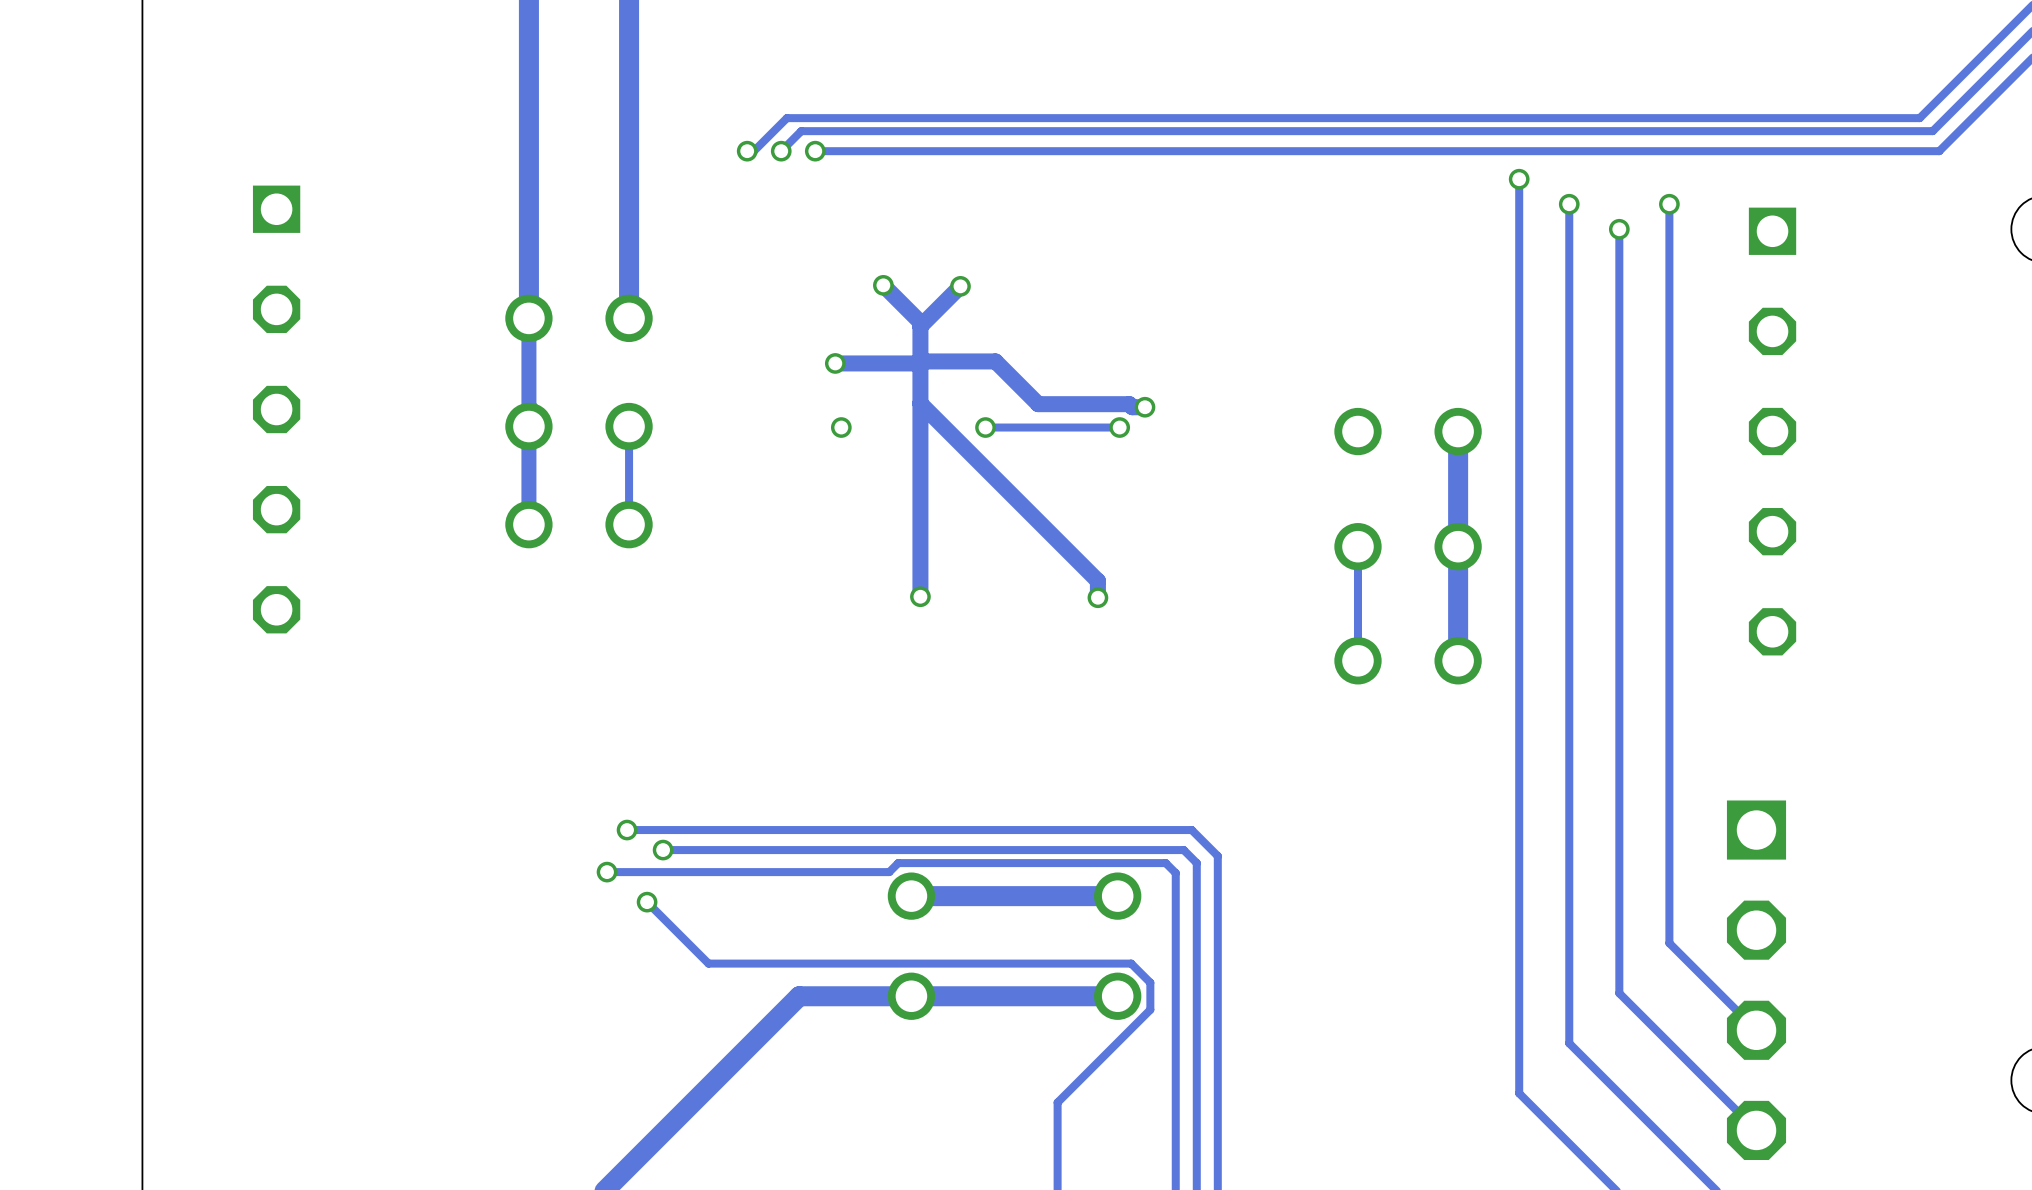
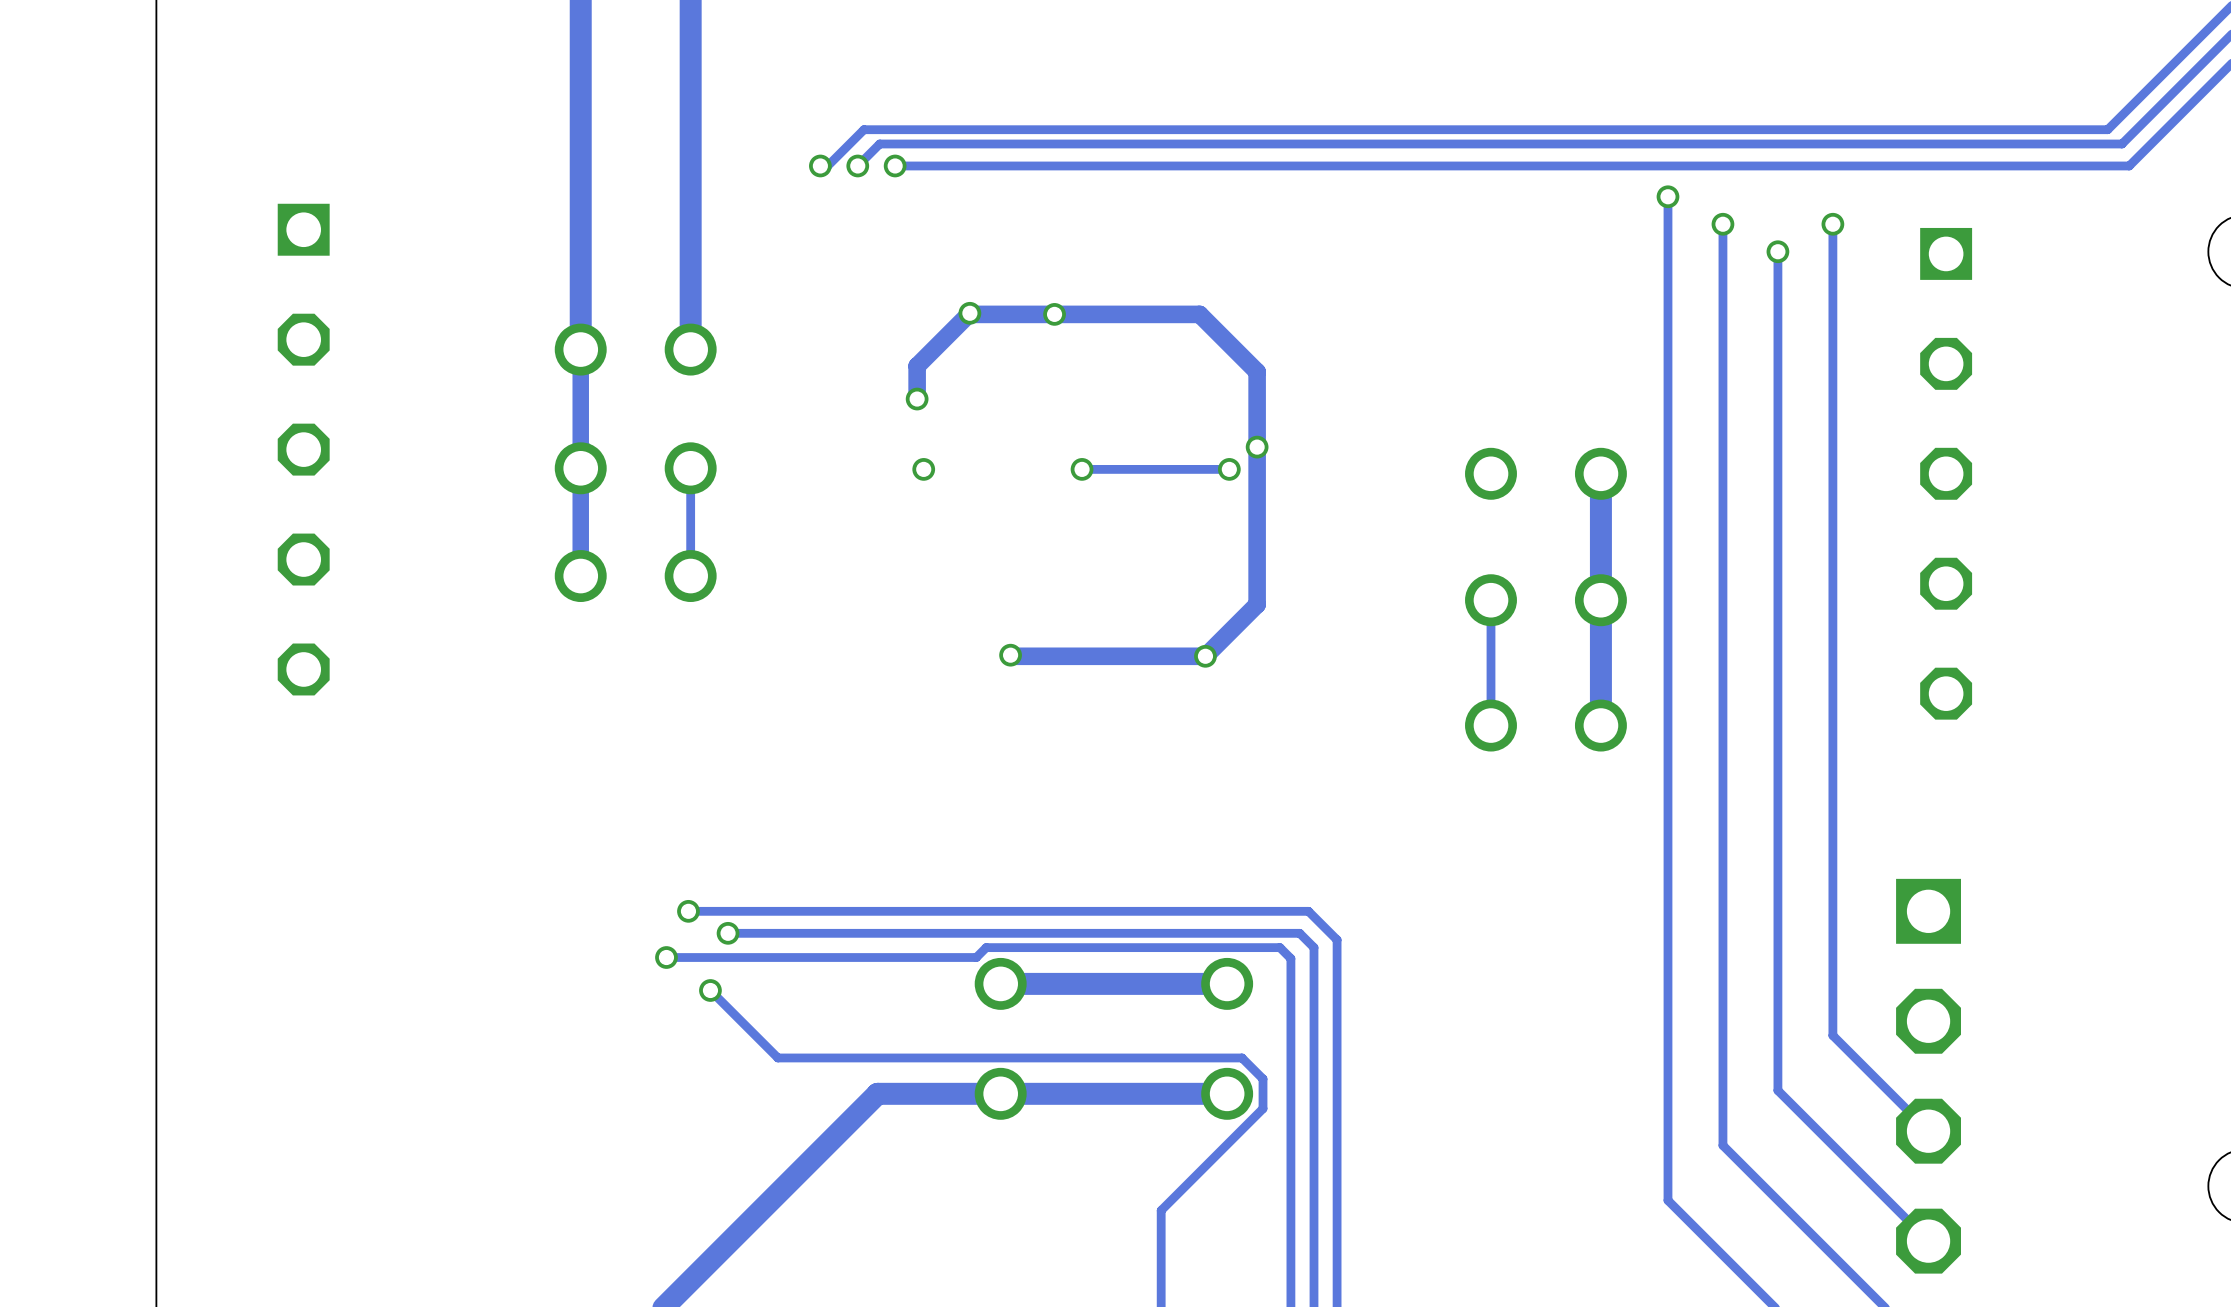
track: (884, 286) (920, 322) (920, 596) -> (971, 314) (1199, 314) (1257, 371) (1257, 604) (1205, 656) (1010, 655)
track: (960, 286) (920, 326) -> none
track: (835, 363) (995, 361) (1038, 404) (1129, 404) (1132, 407) (1144, 407) -> (917, 399) (917, 366) (969, 313)
track: (920, 403) (1097, 580) (1097, 597) -> none

